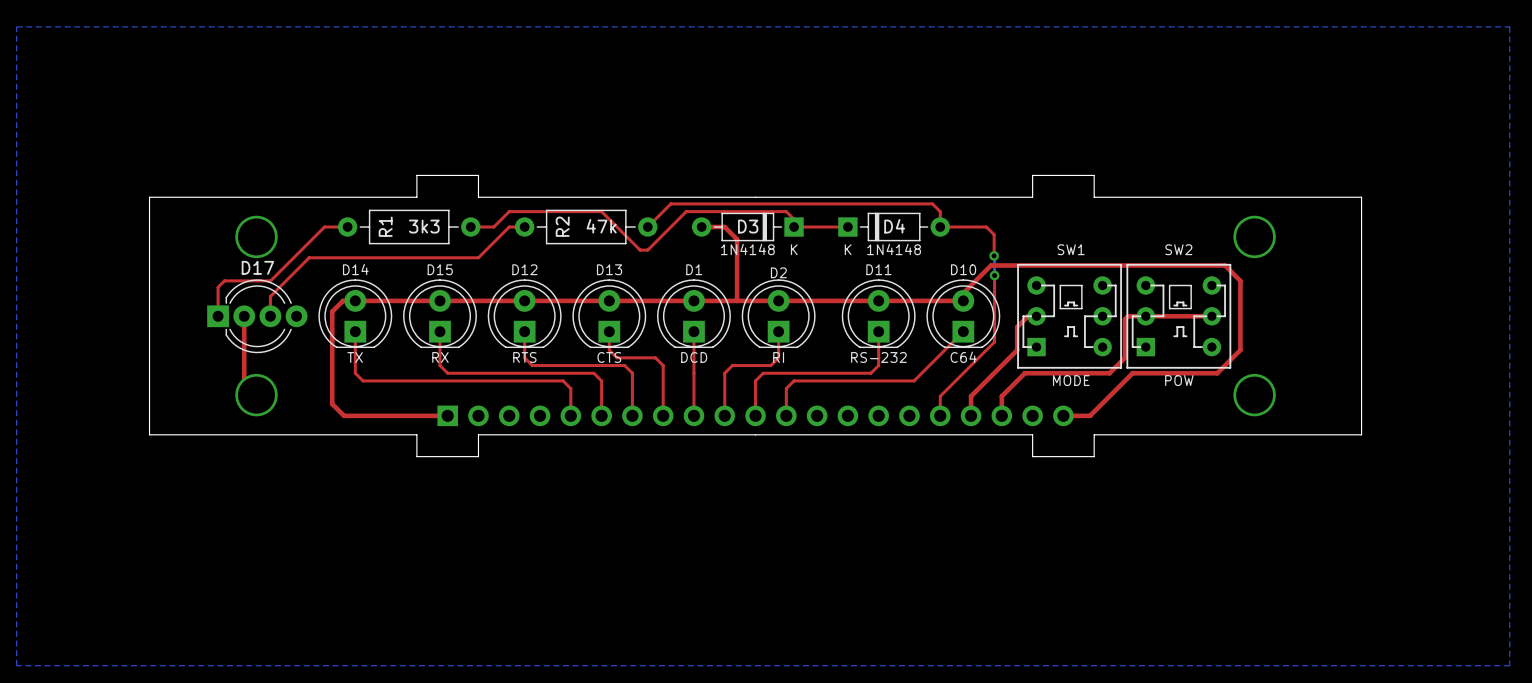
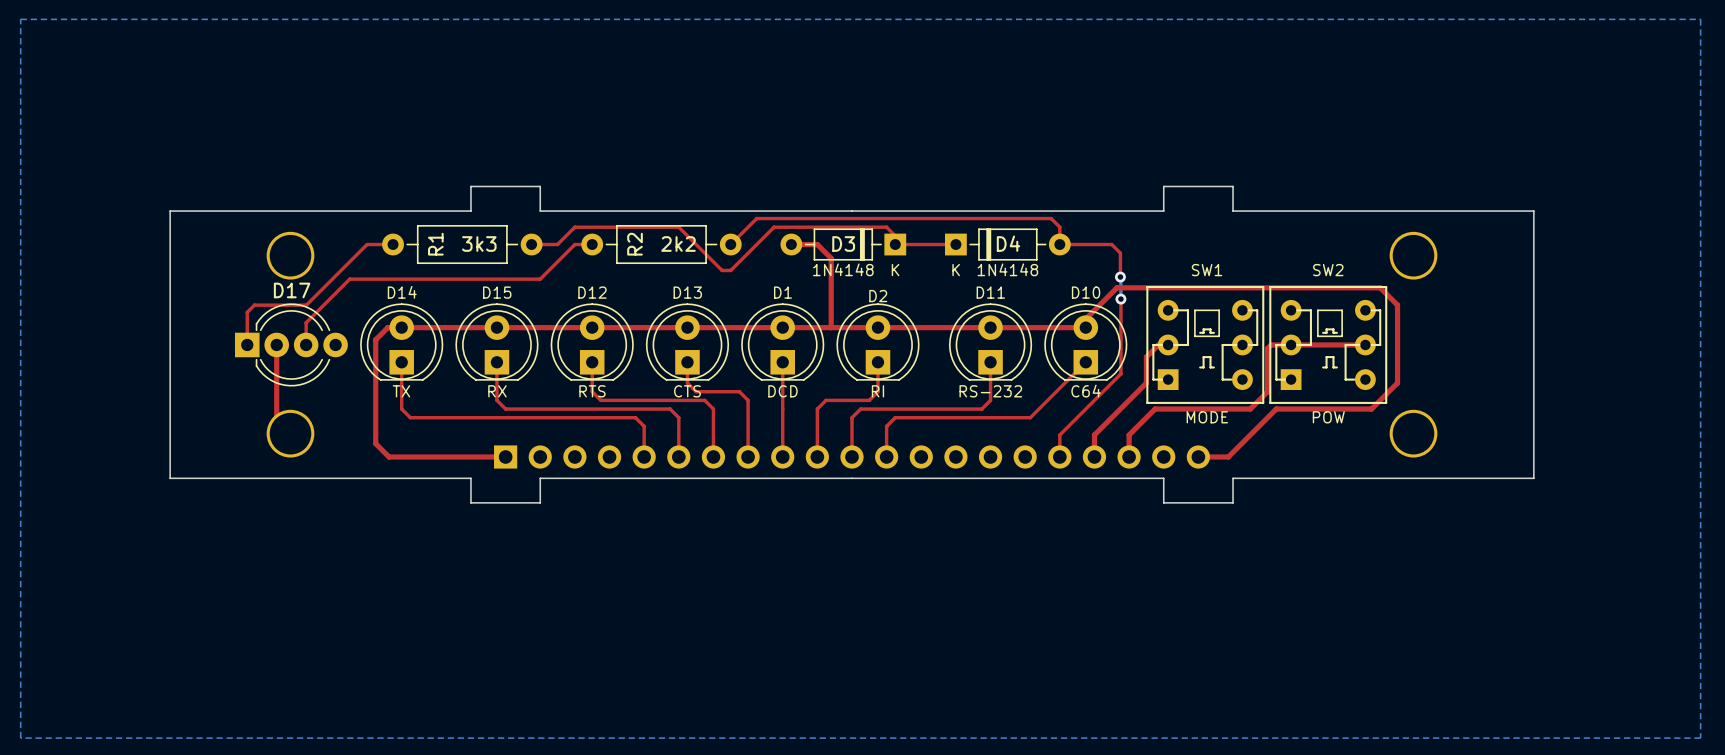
R2 value: 47k (601, 226) -> 2k2 (678, 244)

